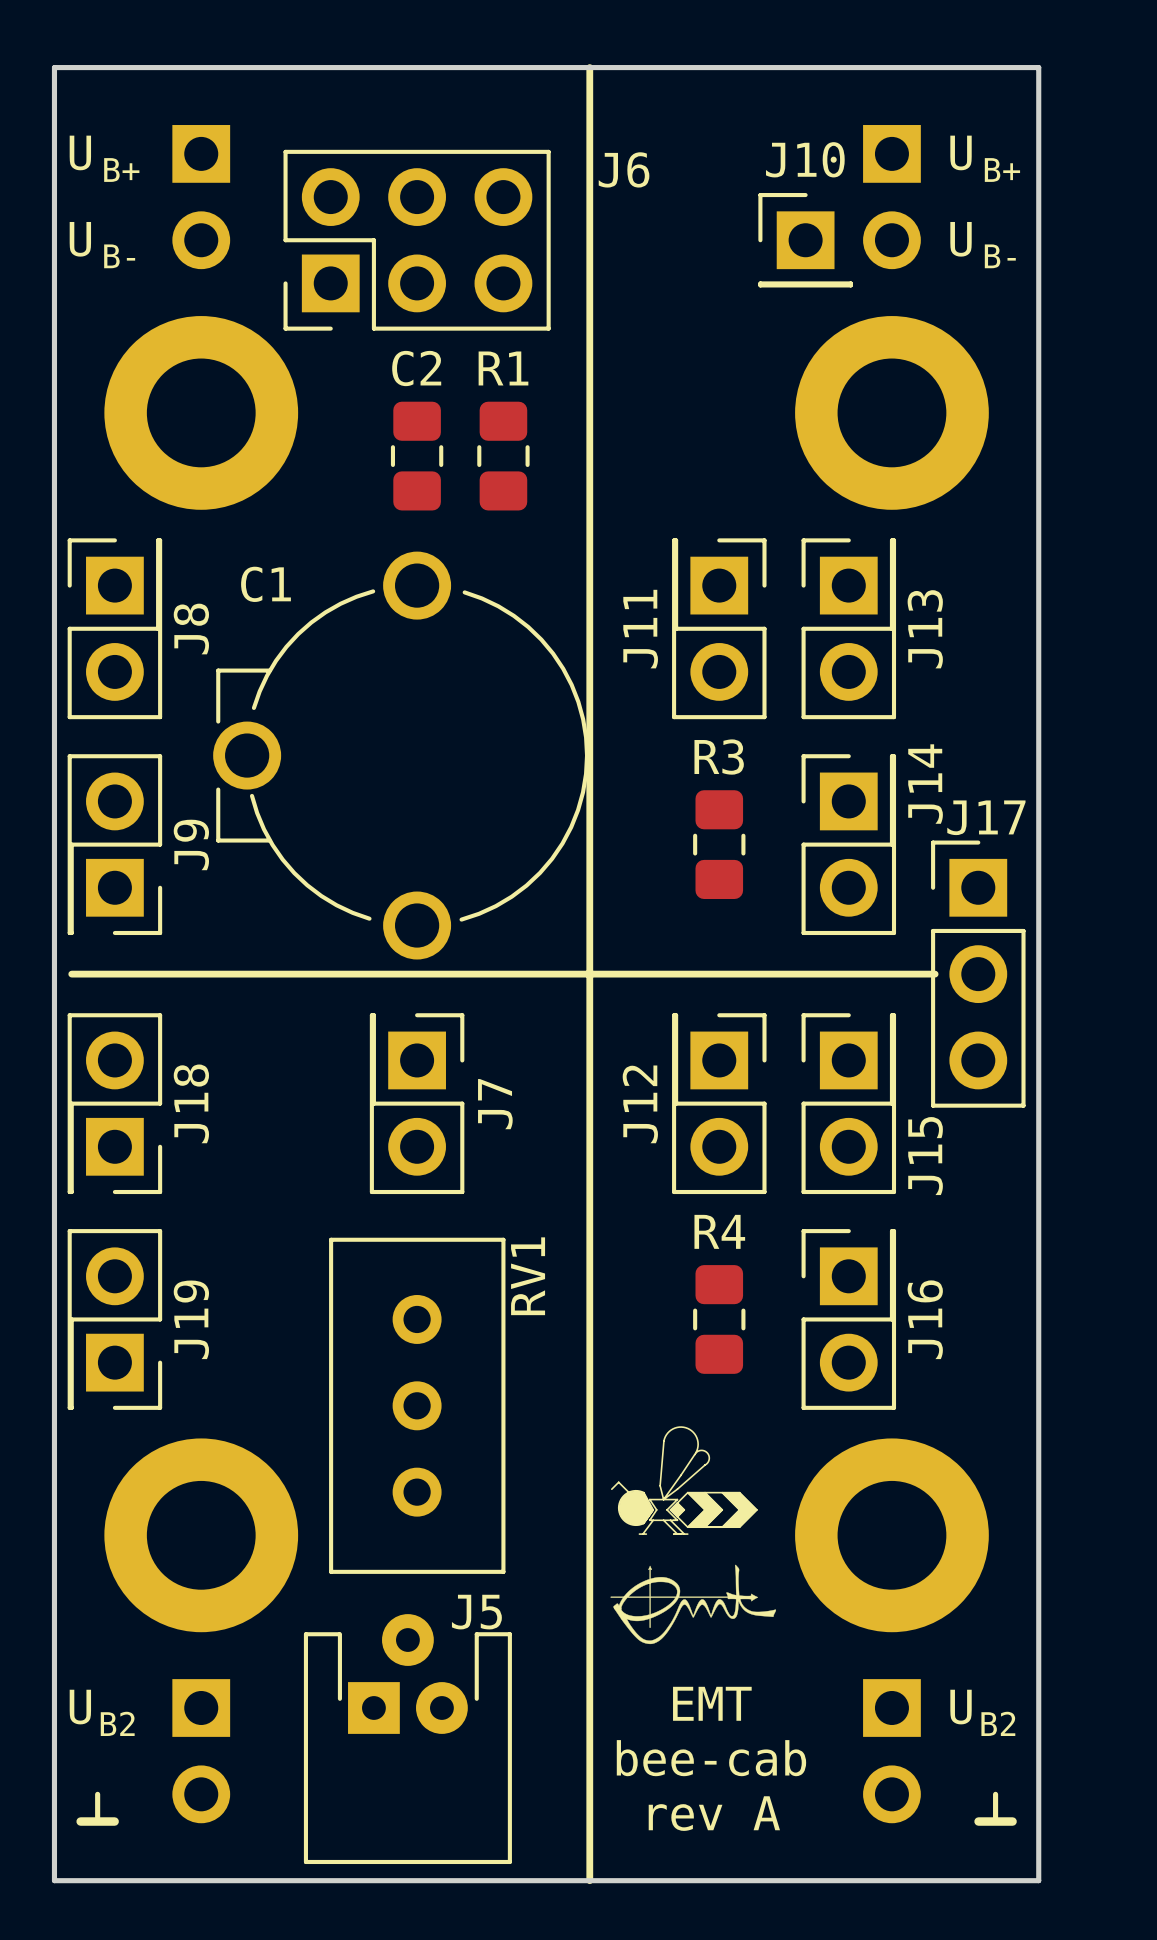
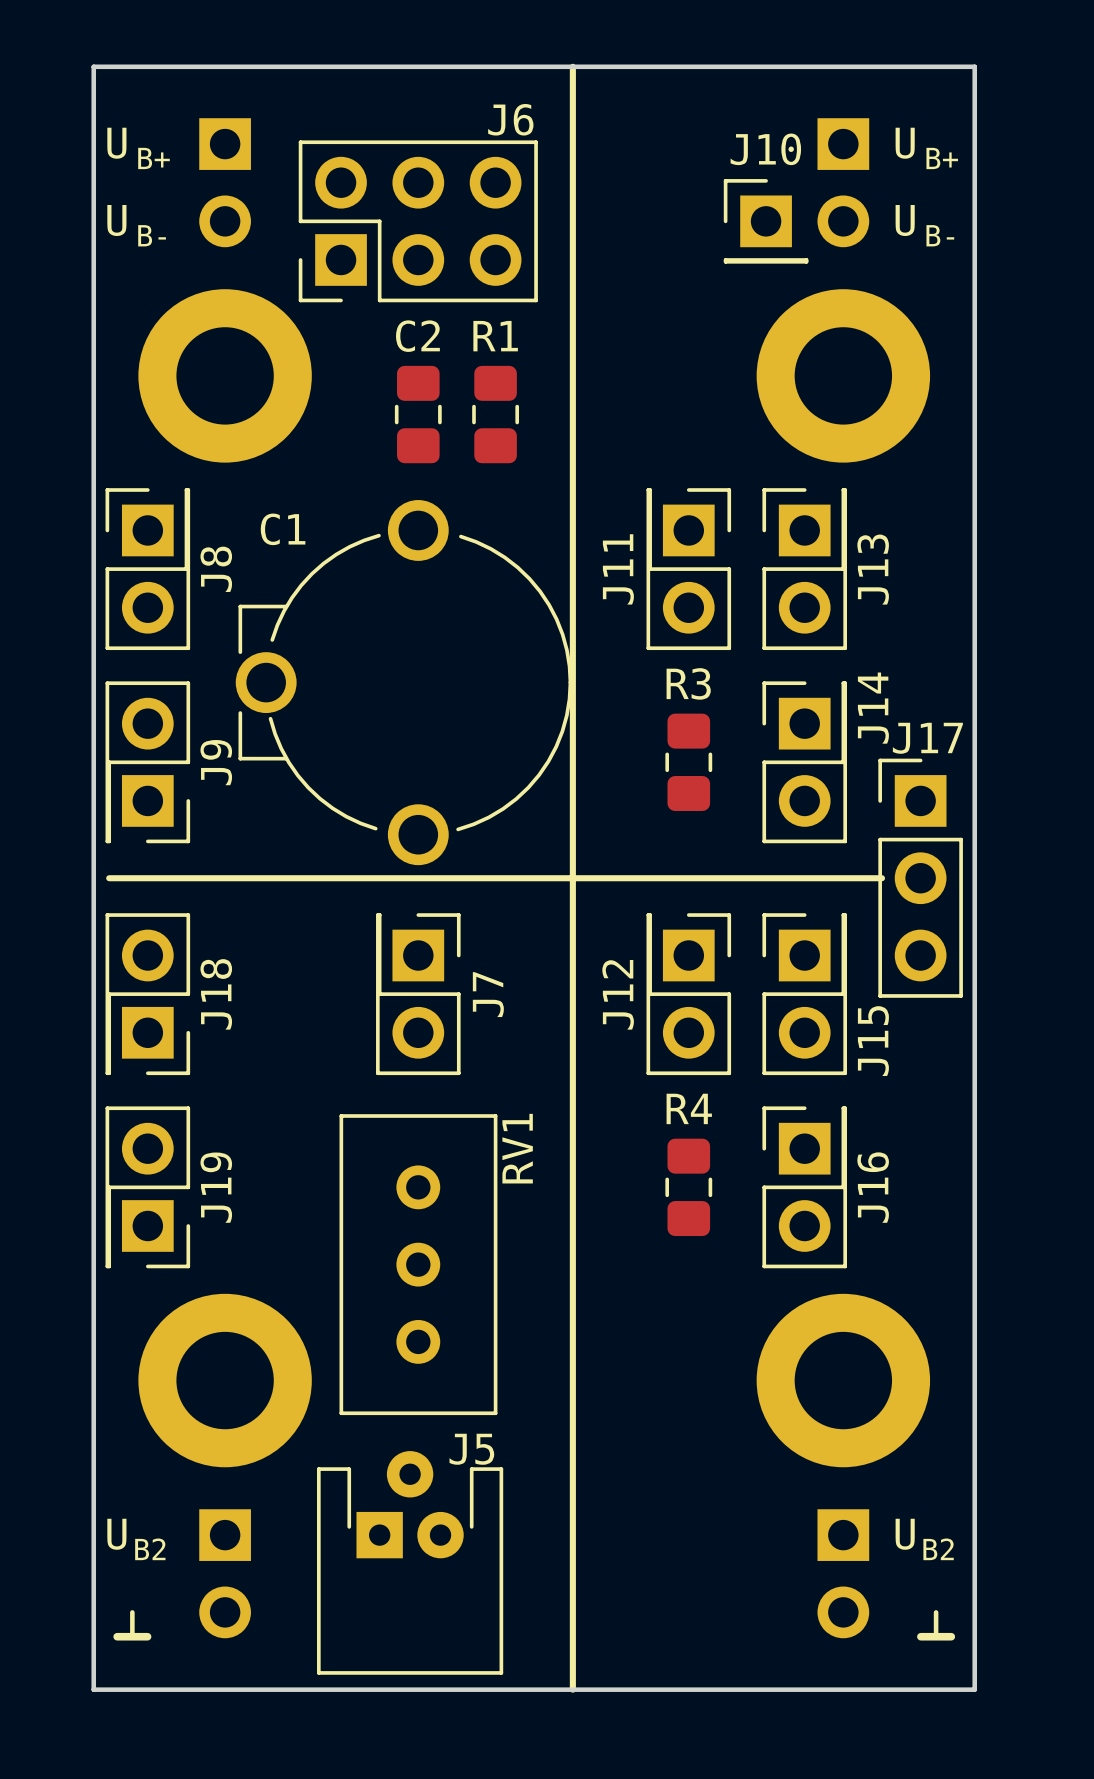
J6 name position: J6 (624, 169) -> J6 (510, 119)
drawing: [610, 1426, 777, 1645] -> none
text: EMT (712, 1703) -> none
text: bee-cab (711, 1758) -> none
text: rev A (714, 1813) -> none

